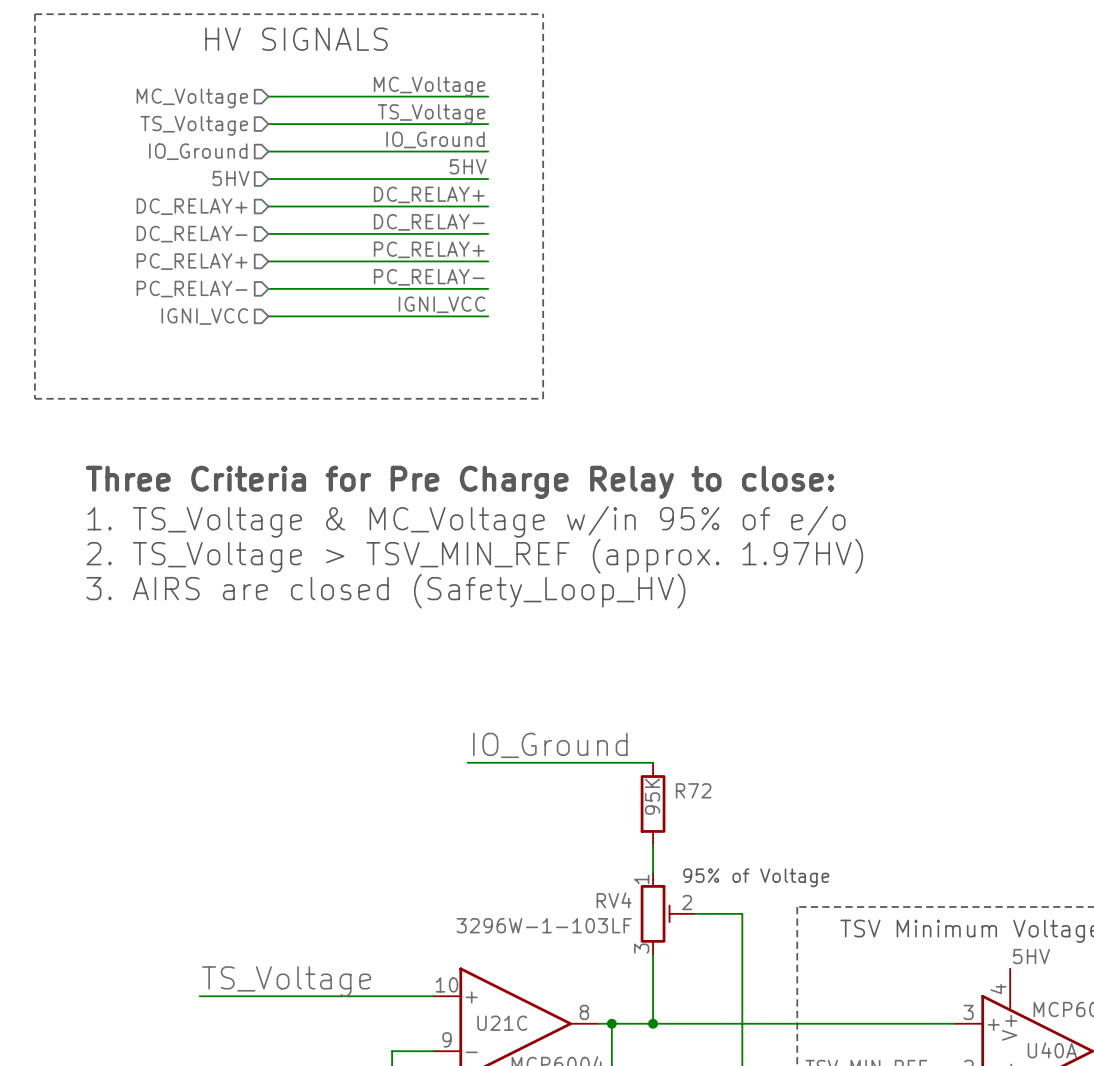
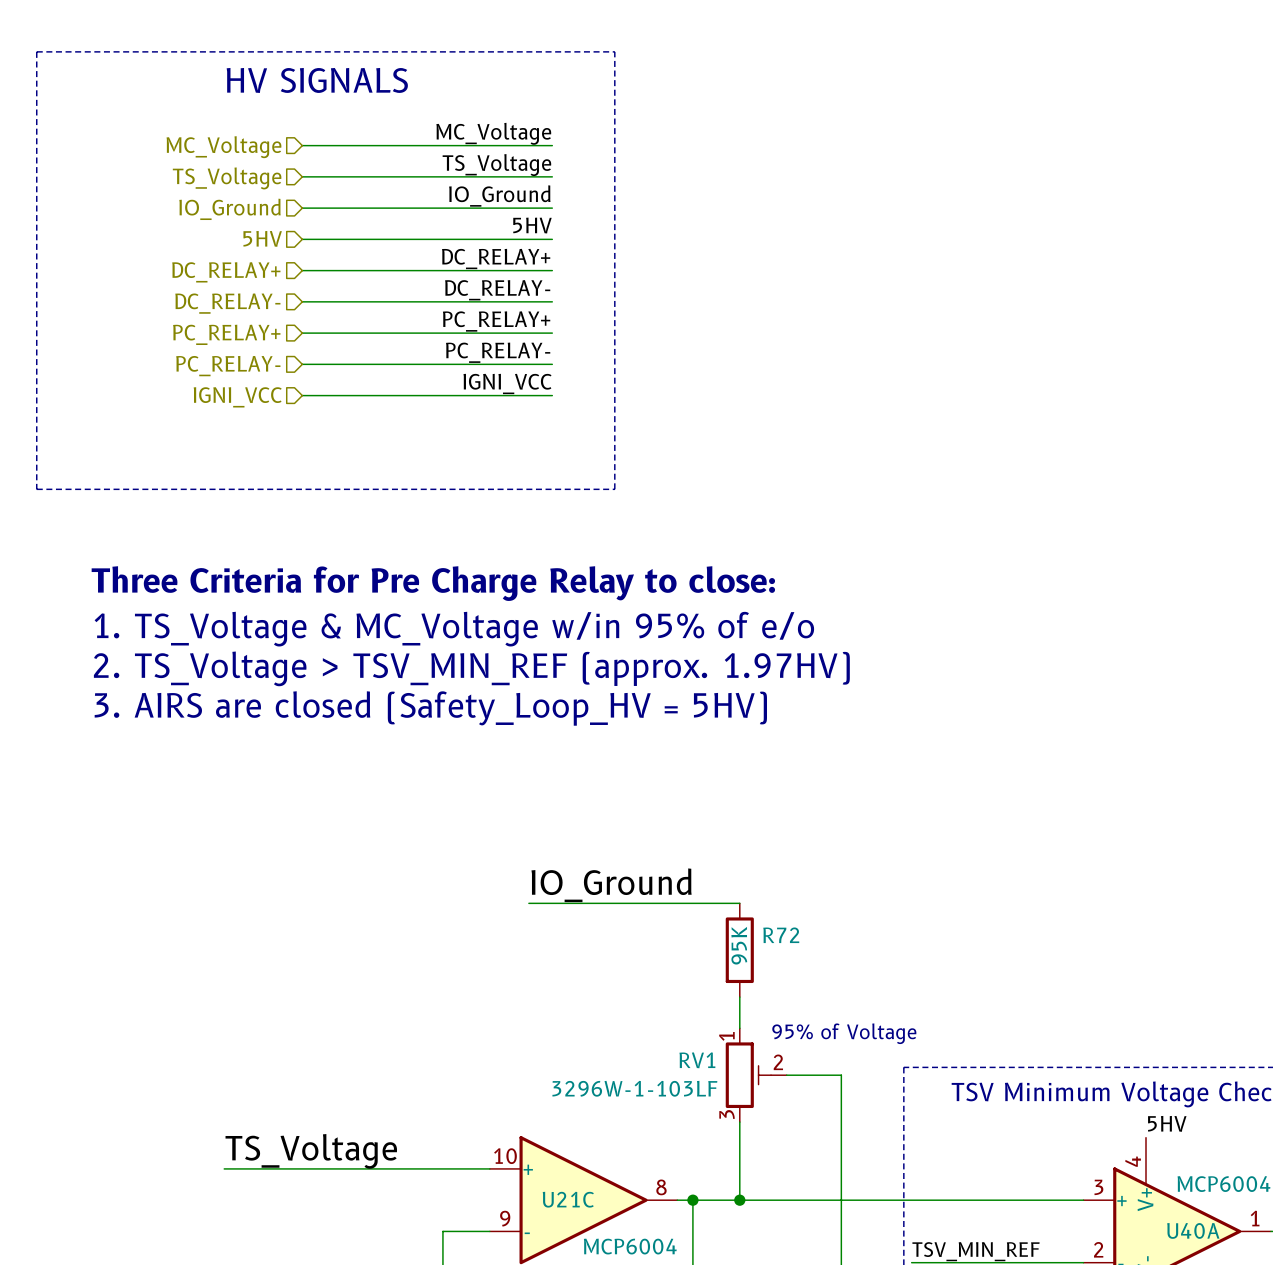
text: 3. AIRS are closed (Safety_Loop_HV) (385, 591) -> 3. AIRS are closed (Safety_Loop_HV = 5HV) (430, 708)
RV4 name: RV4 (614, 900) -> RV1 (697, 1060)

